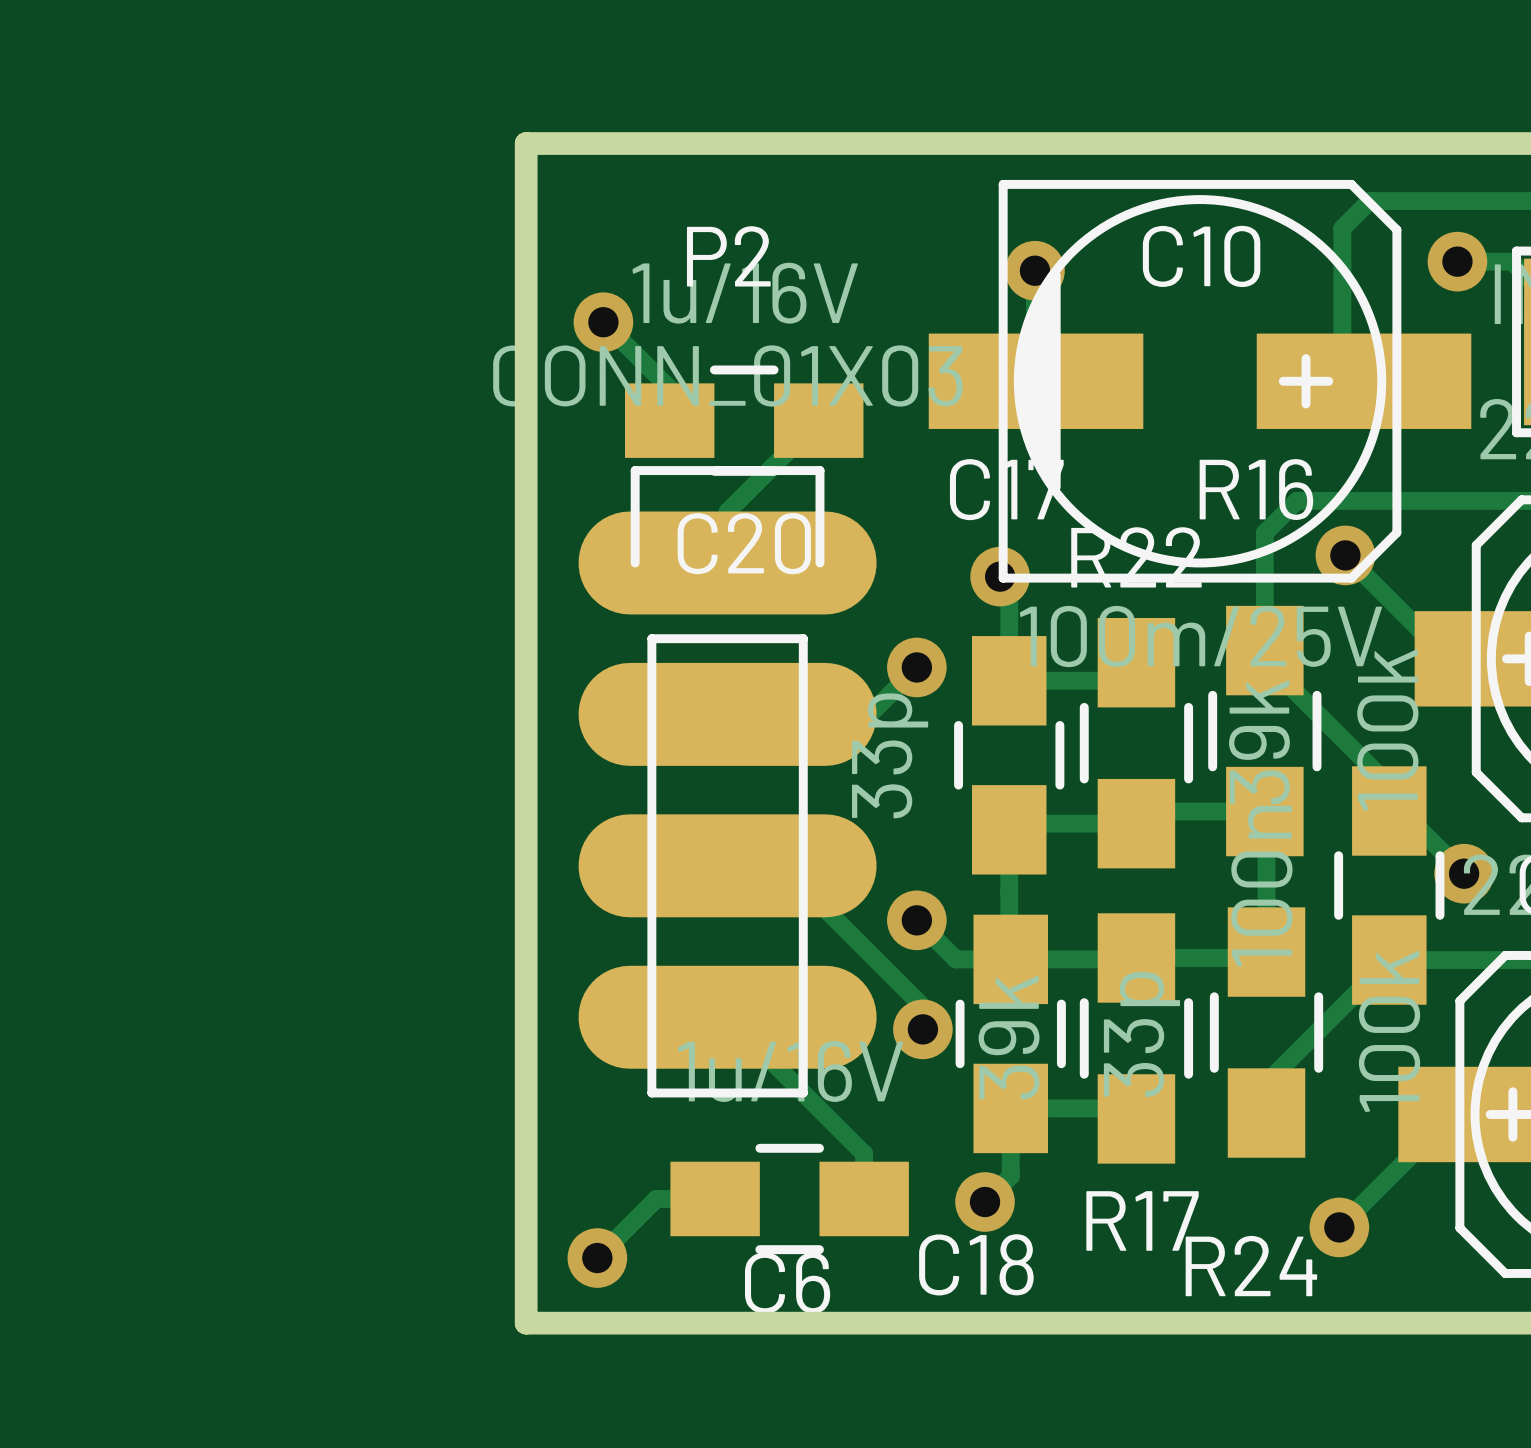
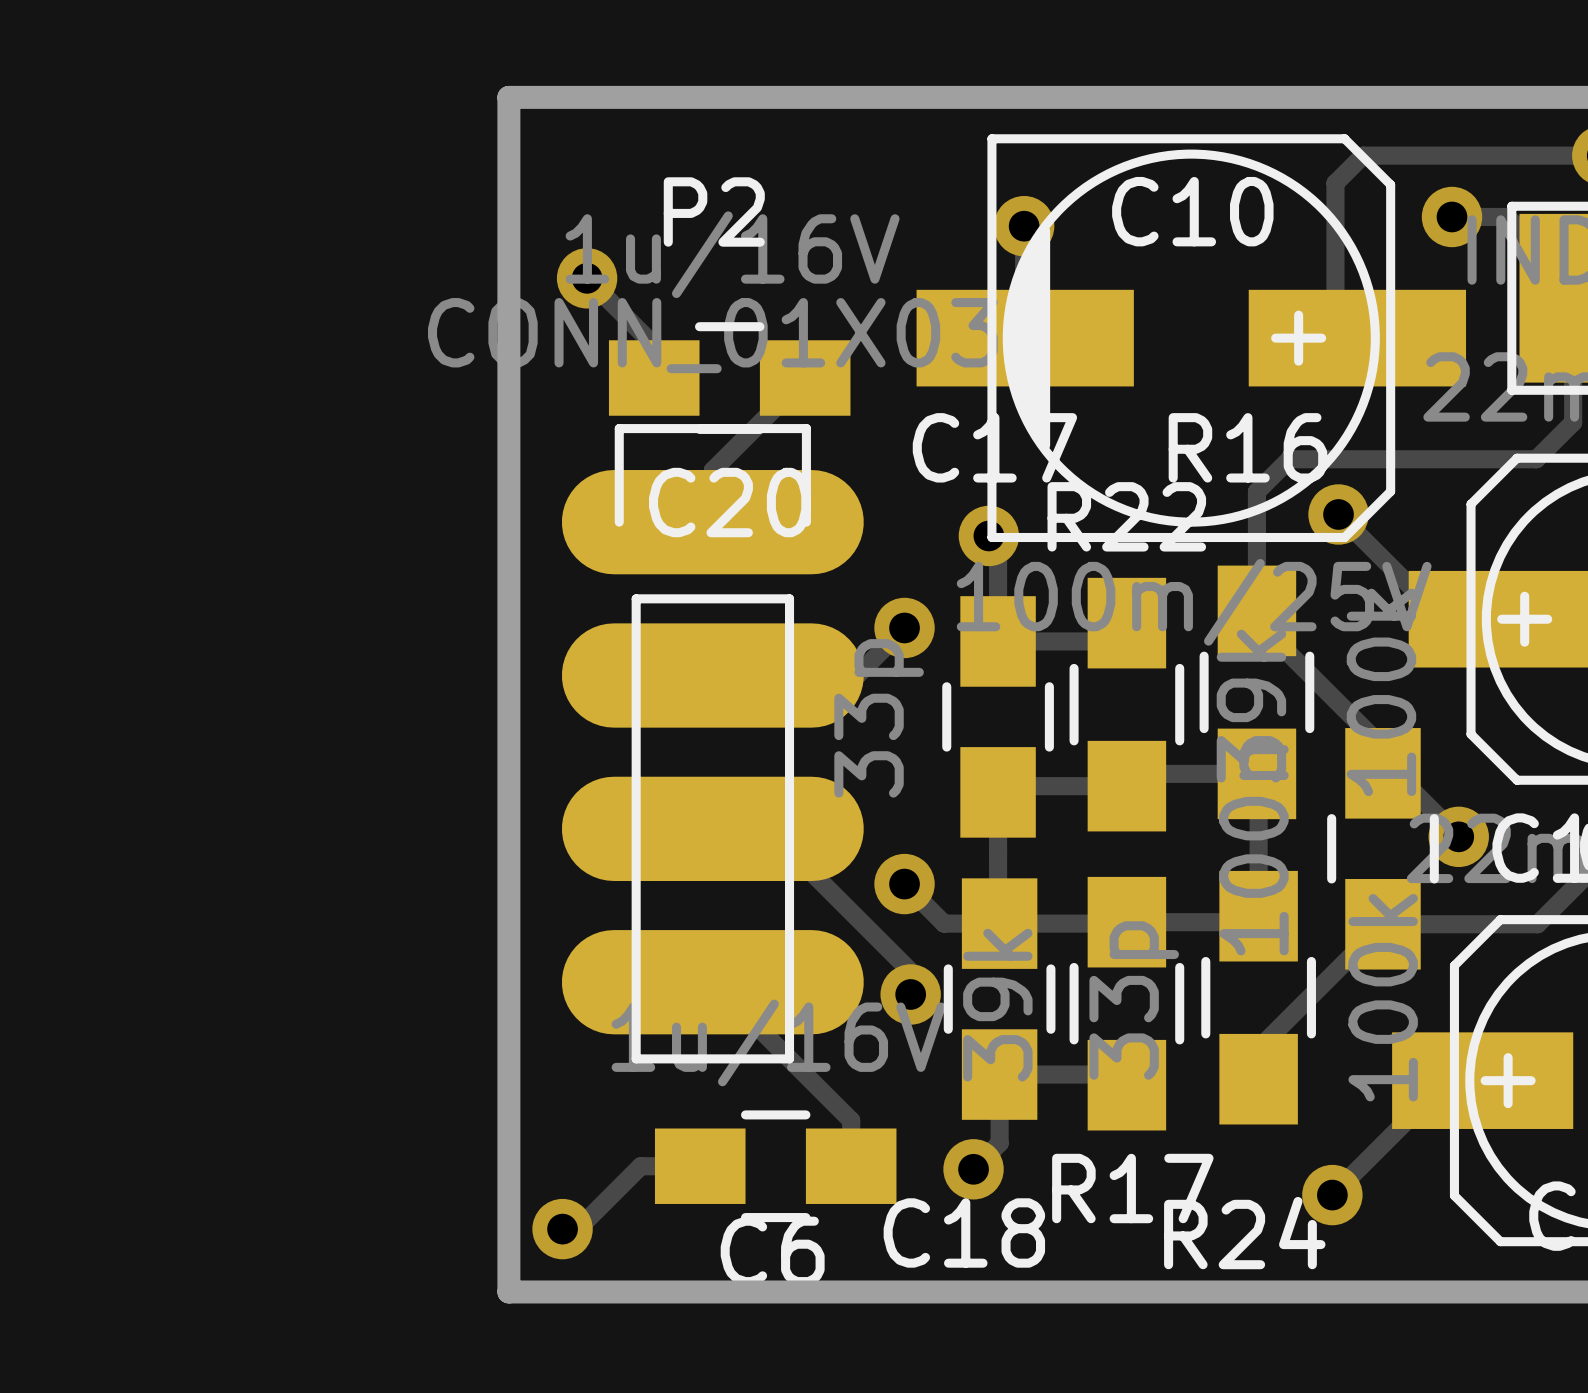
via position: (597, 1258) -> (562, 1229)

